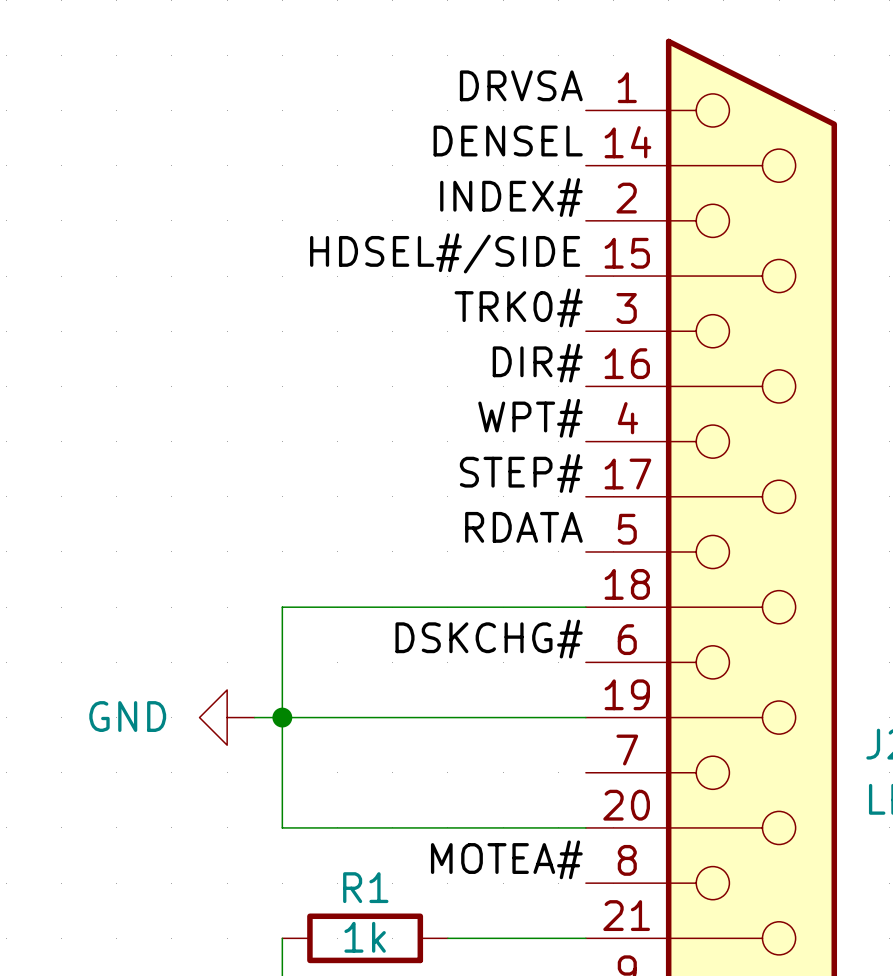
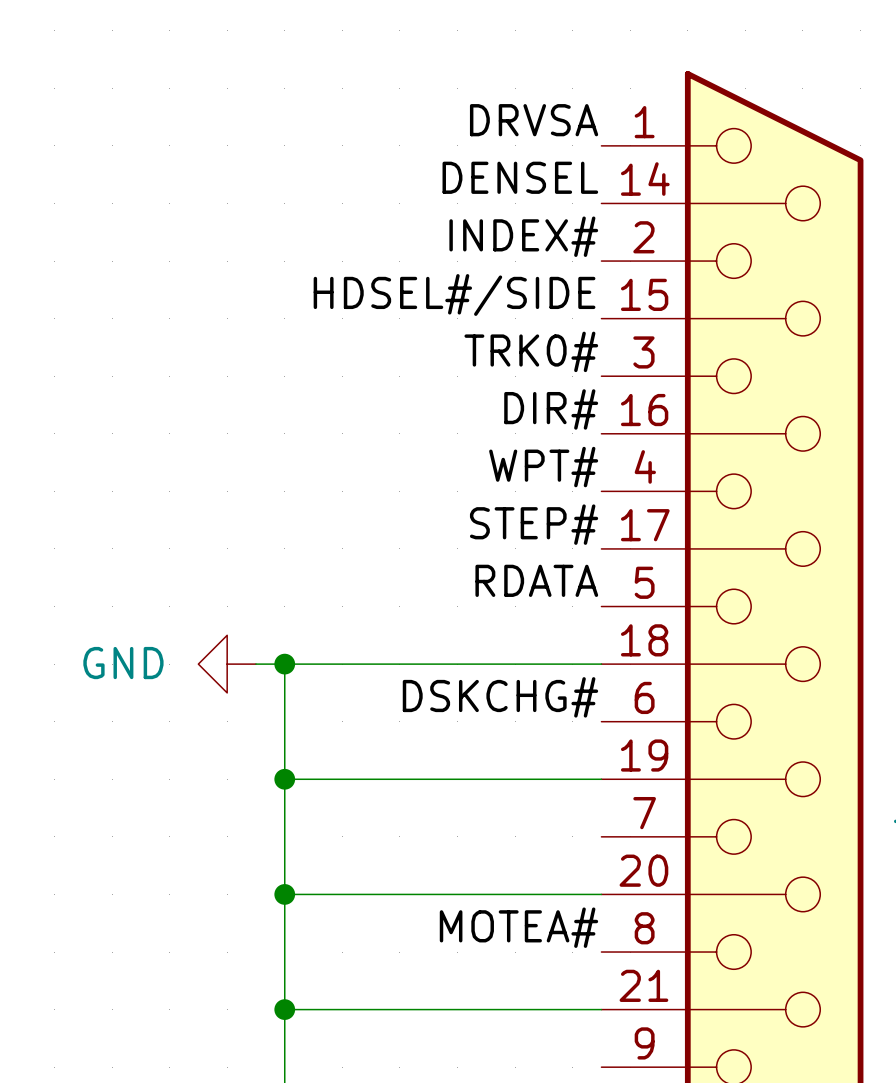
junction: none -> (284, 664)
power symbol position: GND (227, 717) -> GND (227, 664)
wire: (254, 717) (282, 717) -> (255, 664) (284, 664)
wire: none -> (284, 894) (284, 1009) (457, 1009)
junction: none -> (284, 894)
junction: none -> (284, 1009)
R1: 1k (365, 938) -> none

